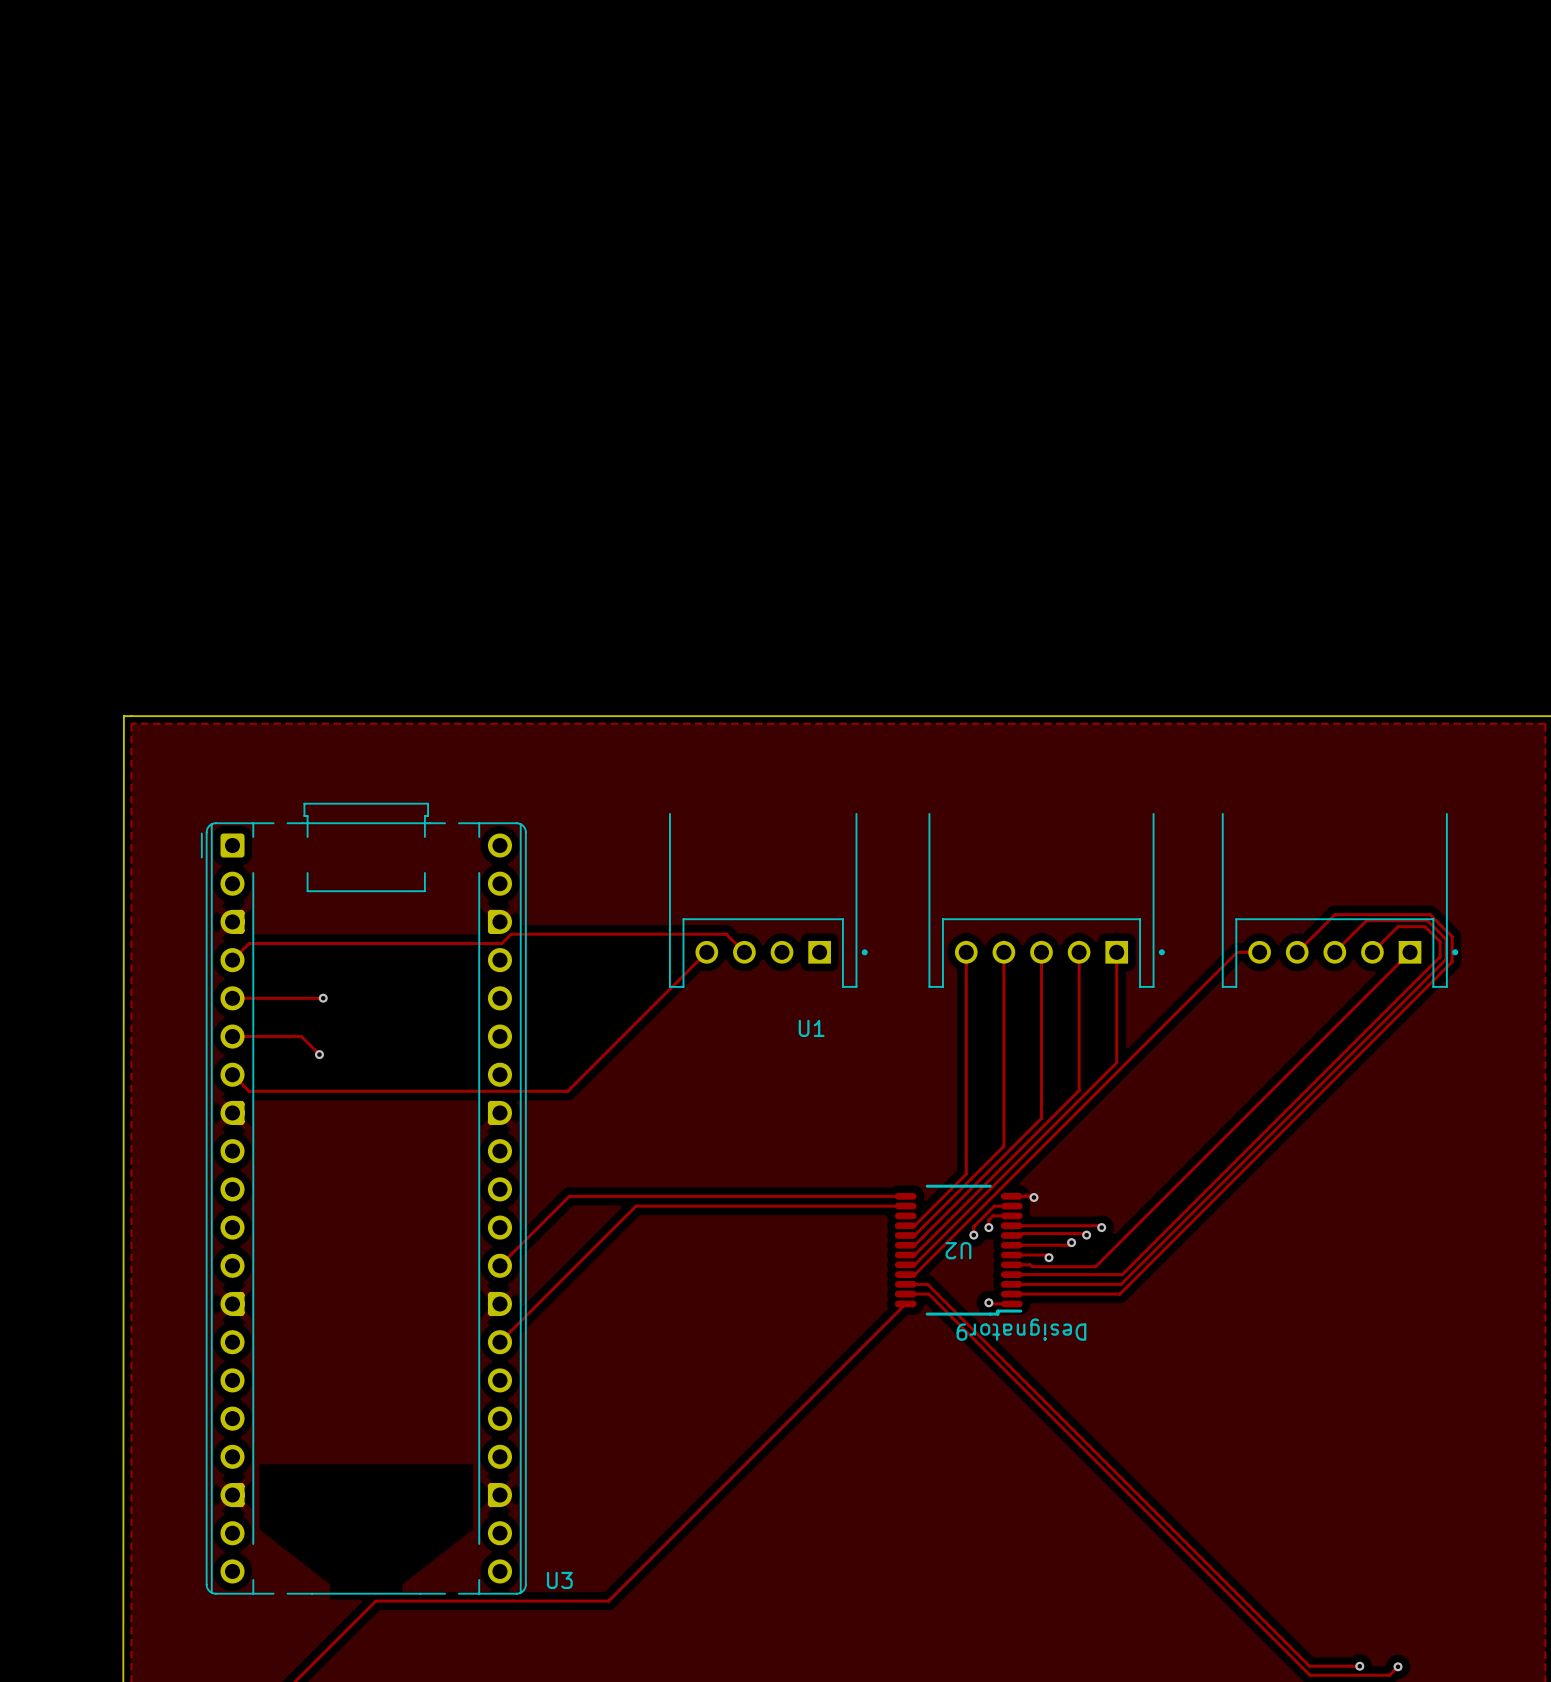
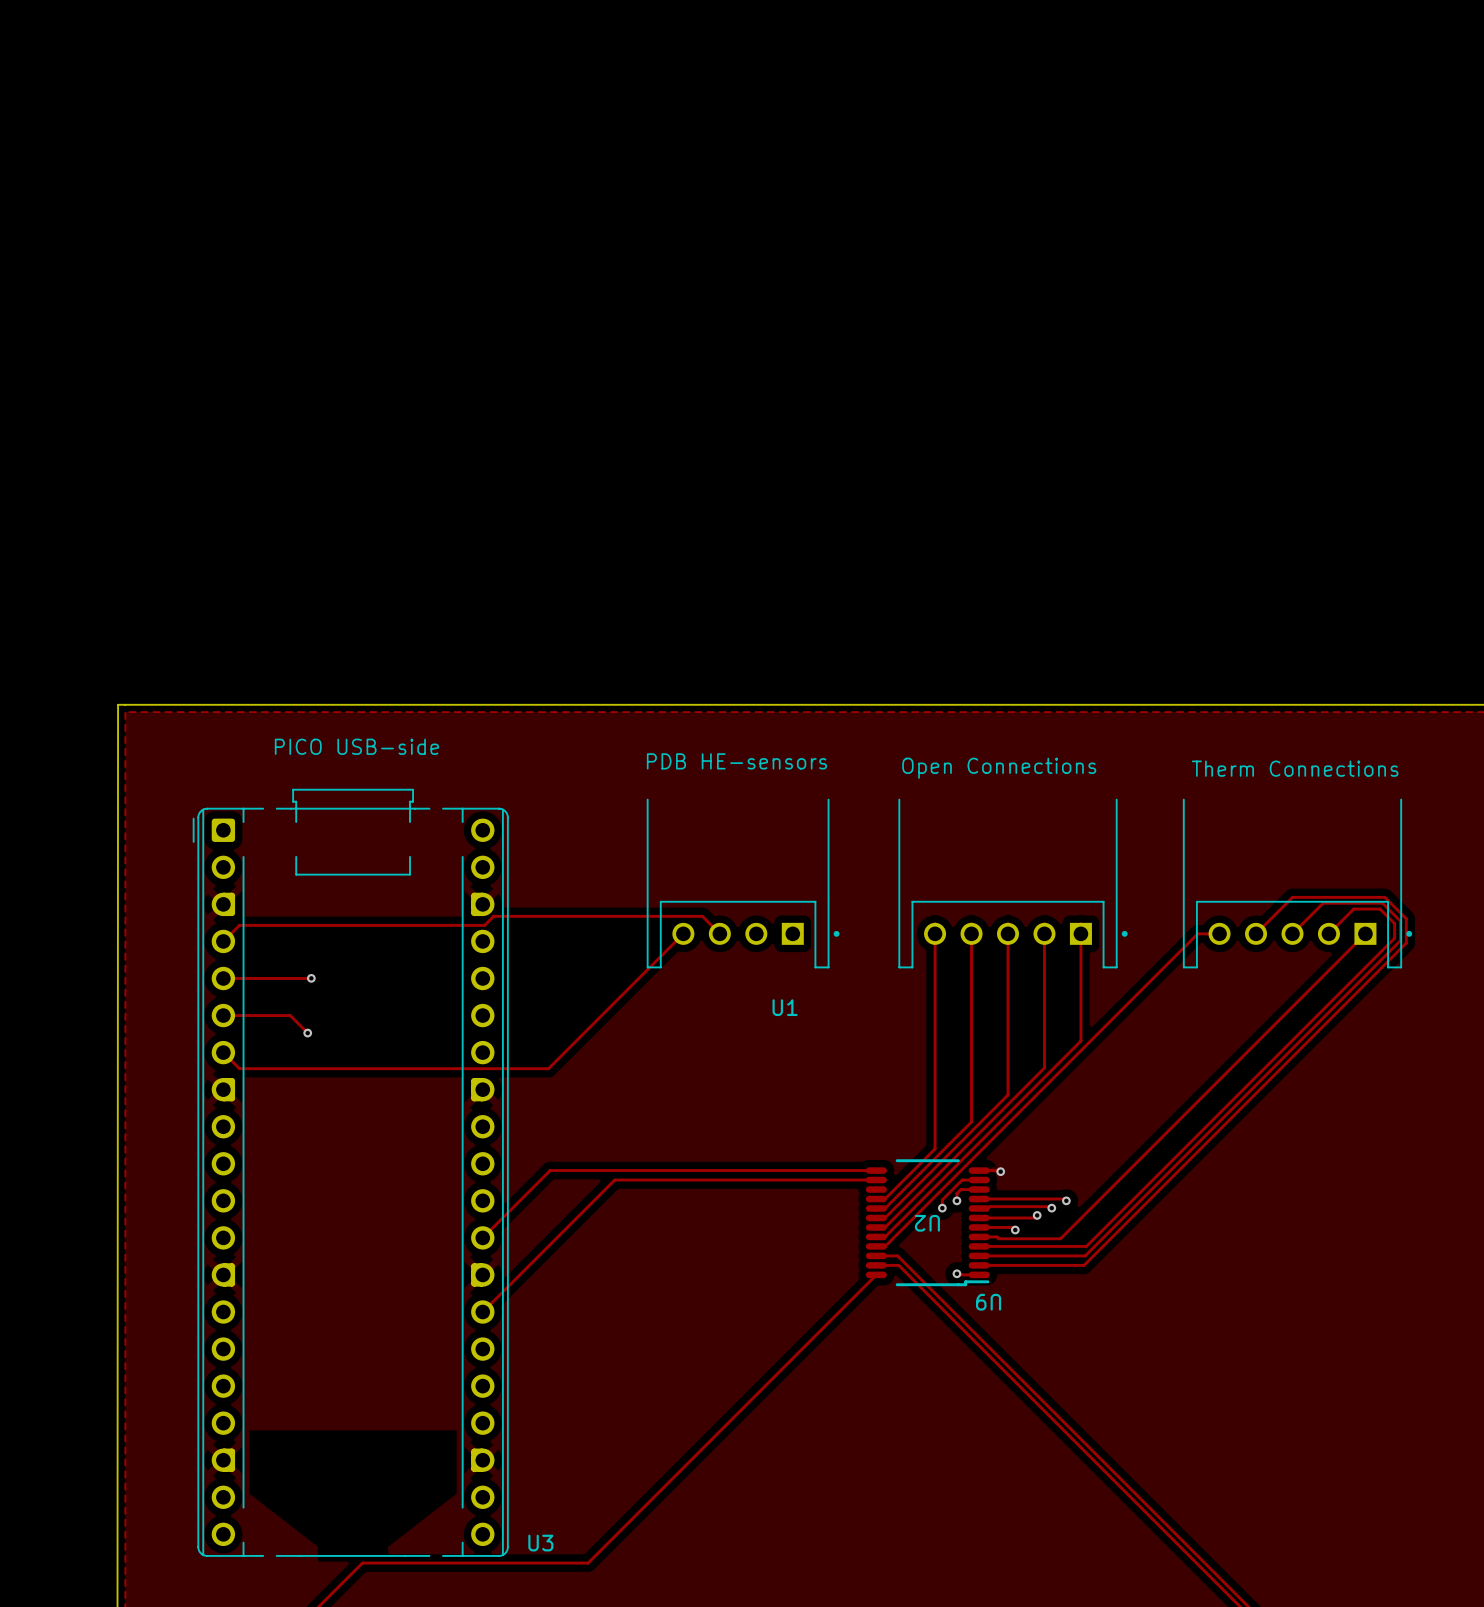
text: none -> PICO USB-side (356, 746)
text: none -> PDB HE-sensors (736, 761)
text: none -> Open Connections (999, 768)
text: none -> Therm Connections (1295, 768)
U2 text: Designator9 (1021, 1329) -> U9 (988, 1302)

